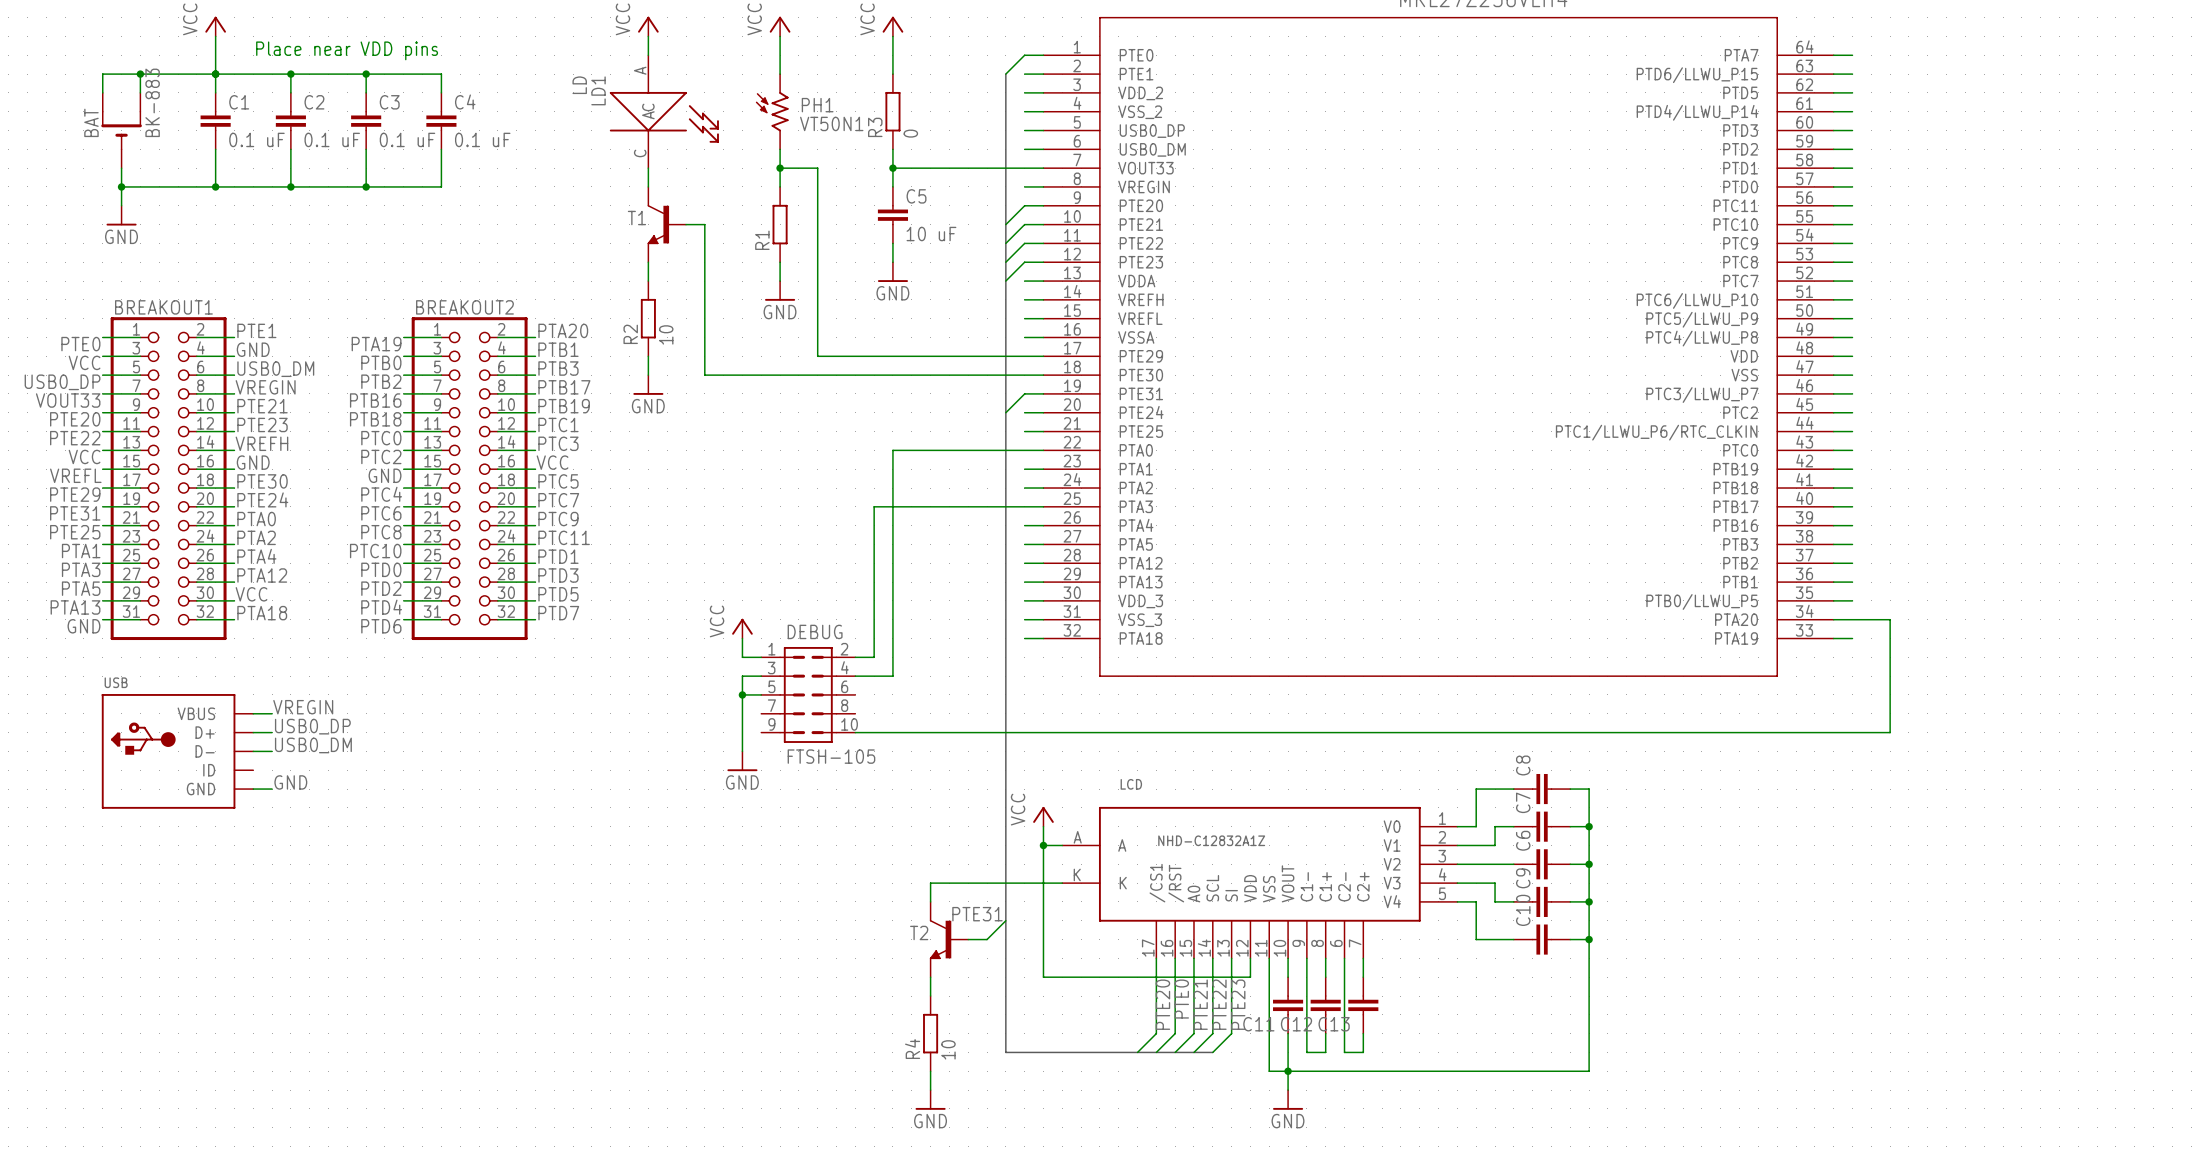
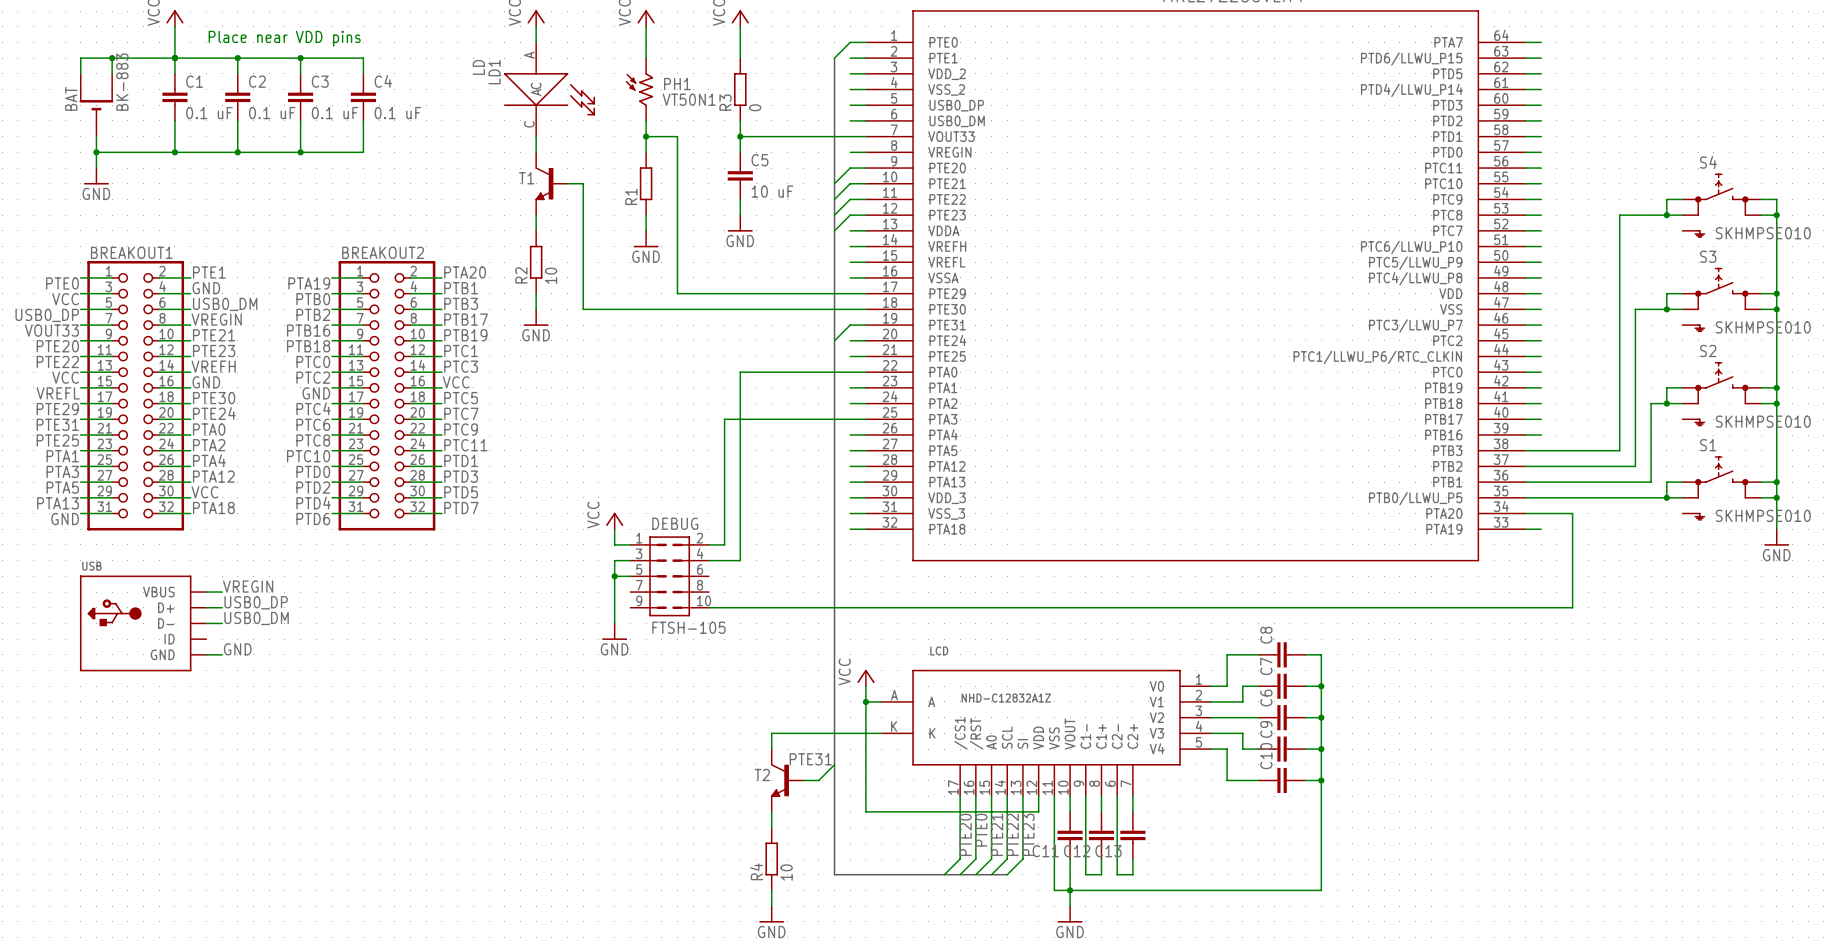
wire: none -> (1682, 199) (1666, 199) (1666, 215)
wire: none -> (1761, 199) (1776, 199) (1776, 529)
S4: none -> SKHMPSE010 (1721, 205)
junction: none -> (1666, 215)
wire: none -> (1682, 215) (1619, 215) (1619, 450) (1541, 450)
wire: none -> (1761, 215) (1776, 215)
junction: none -> (1776, 215)
wire: none -> (1682, 293) (1666, 293) (1666, 309)
wire: none -> (1761, 293) (1776, 293)
junction: none -> (1776, 293)
S3: none -> SKHMPSE010 (1721, 299)
junction: none -> (1666, 309)
wire: none -> (1682, 309) (1635, 309) (1635, 466) (1541, 466)
wire: none -> (1761, 309) (1776, 309)
junction: none -> (1776, 309)
wire: none -> (1682, 387) (1666, 387) (1666, 403)
wire: none -> (1761, 387) (1776, 387)
junction: none -> (1776, 387)
S2: none -> SKHMPSE010 (1721, 394)
junction: none -> (1666, 403)
wire: none -> (1682, 403) (1651, 403) (1651, 482) (1541, 482)
wire: none -> (1761, 403) (1776, 403)
junction: none -> (1776, 403)
wire: none -> (1682, 482) (1666, 482) (1666, 497)
wire: none -> (1761, 482) (1776, 482)
junction: none -> (1776, 482)
S1: none -> SKHMPSE010 (1721, 488)
wire: none -> (1541, 497) (1682, 497)
junction: none -> (1666, 497)
wire: none -> (1761, 497) (1776, 497)
junction: none -> (1776, 497)
power symbol: none -> GND (1776, 537)

